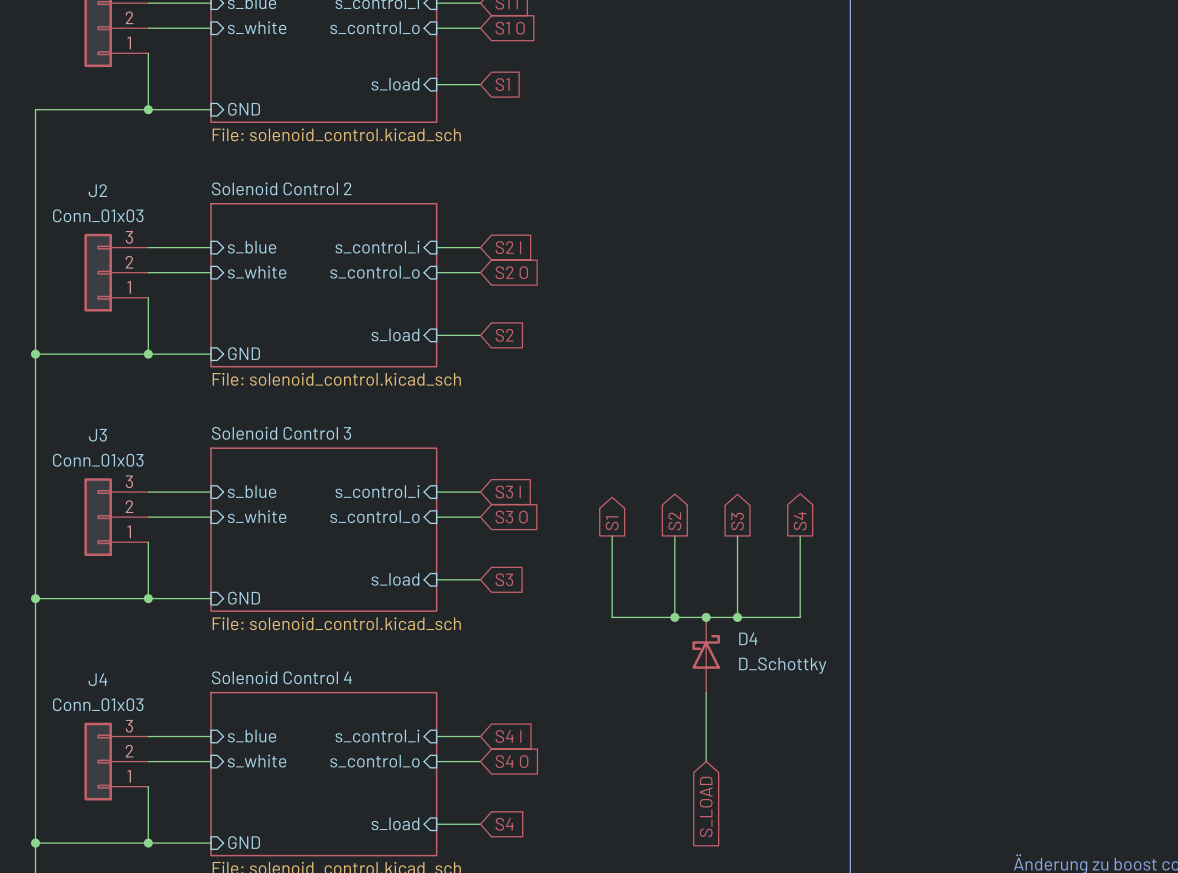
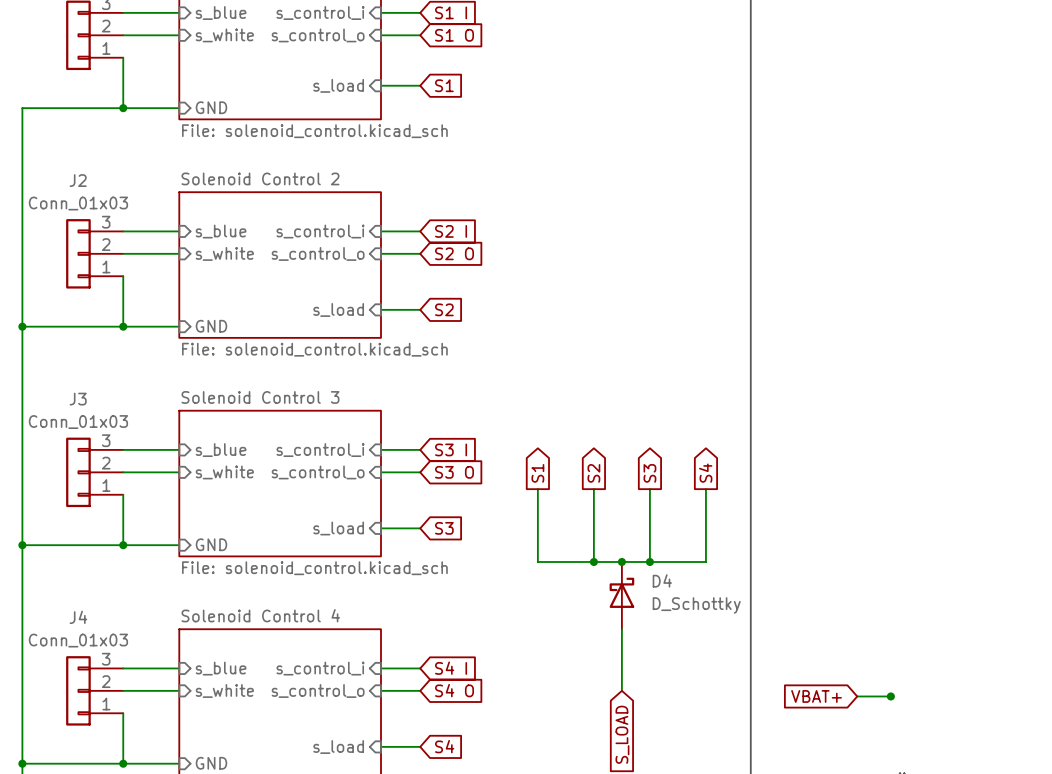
global label: none -> VBAT+ (816, 696)
wire: none -> (857, 696) (890, 696)
junction: none -> (890, 696)

